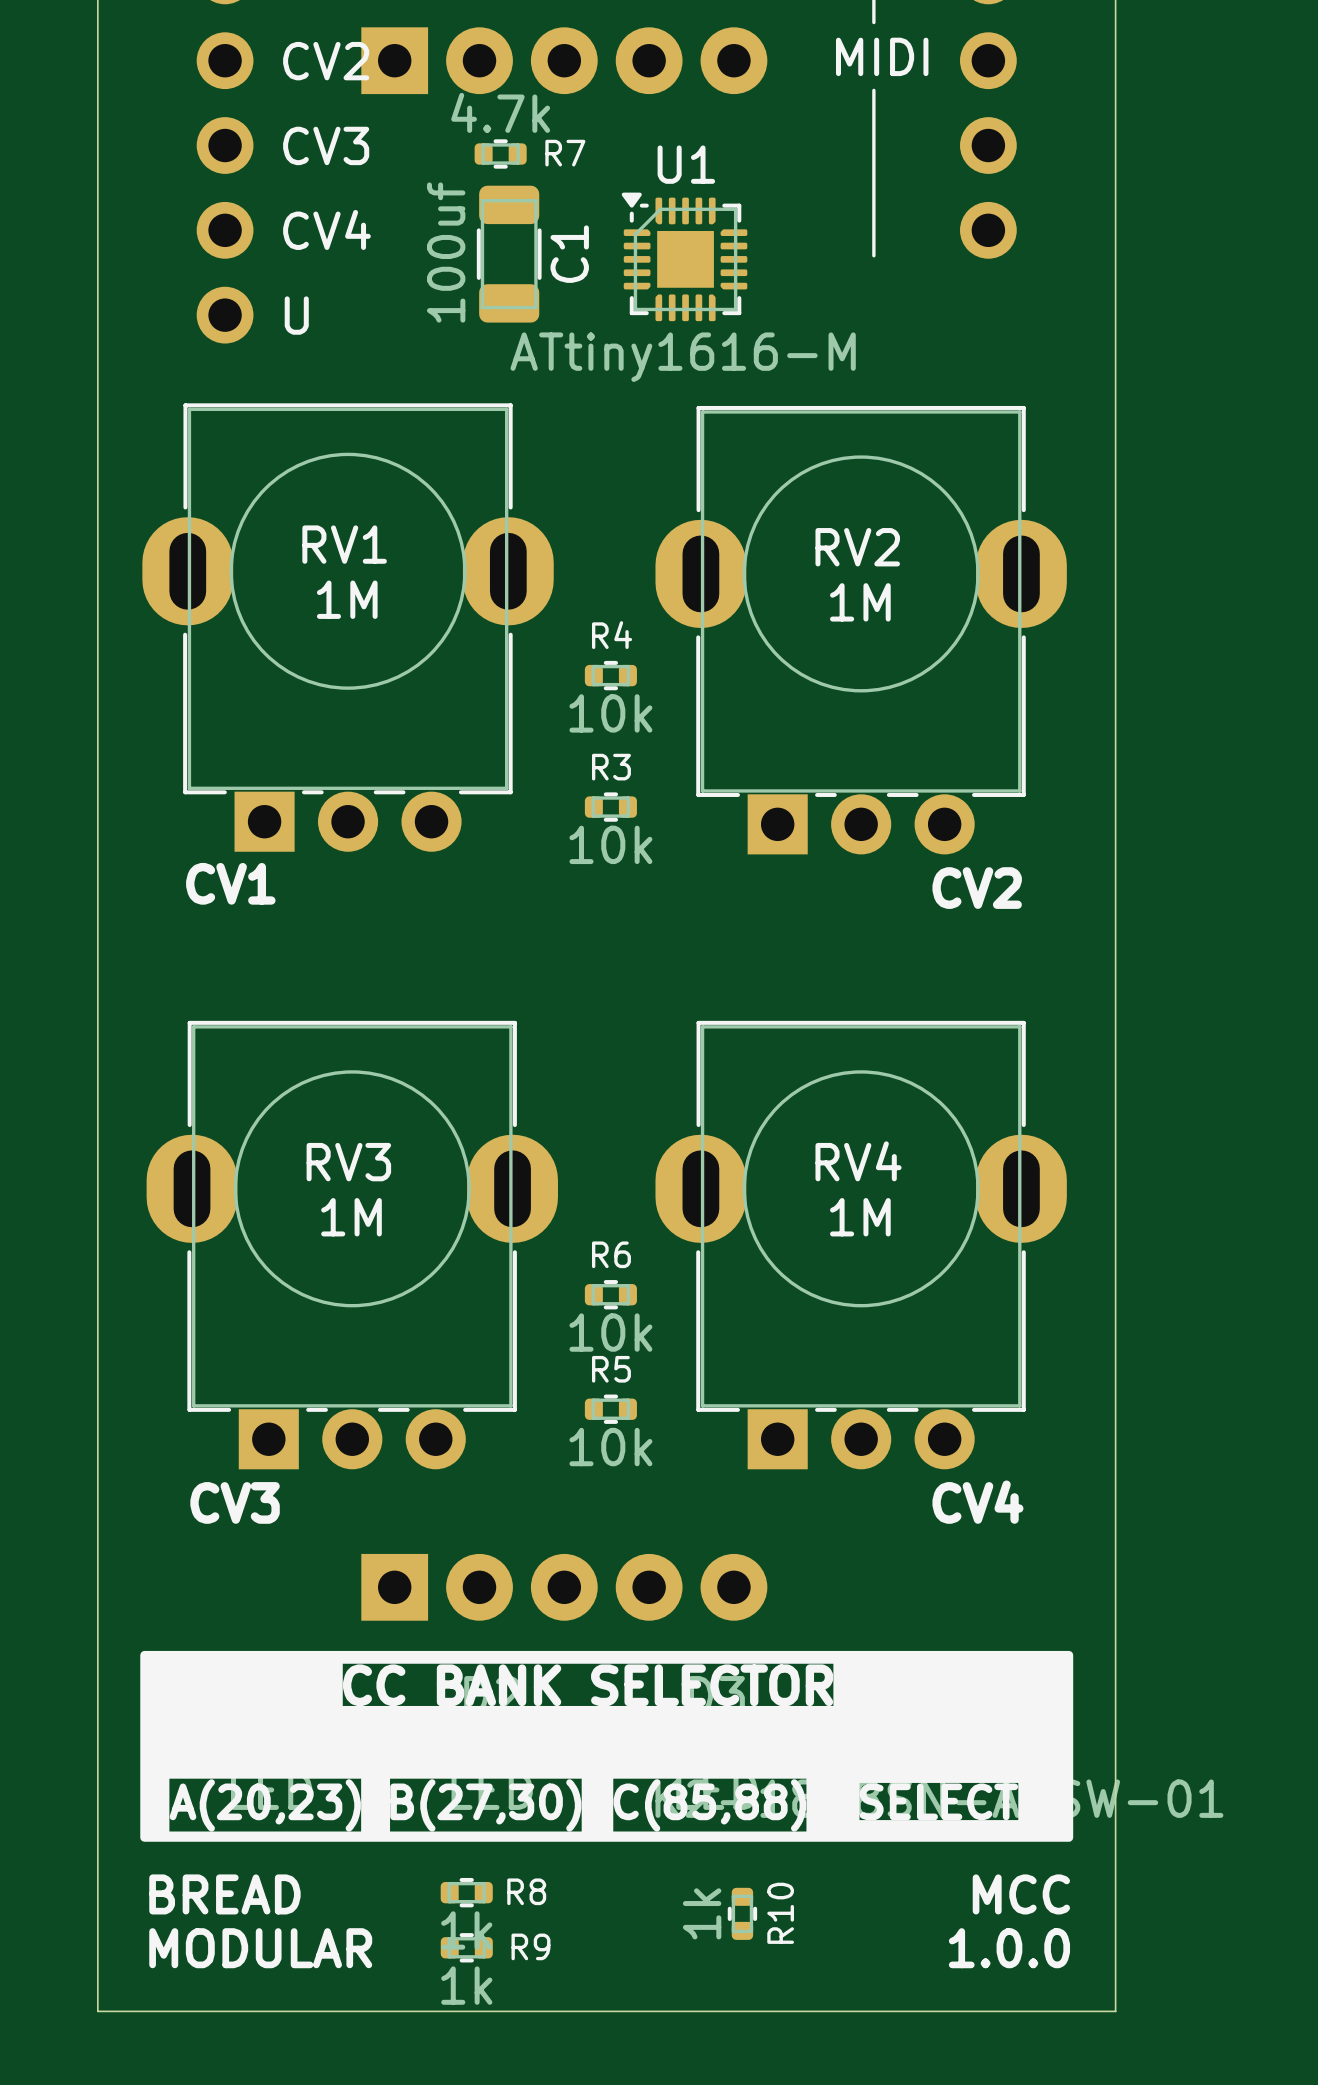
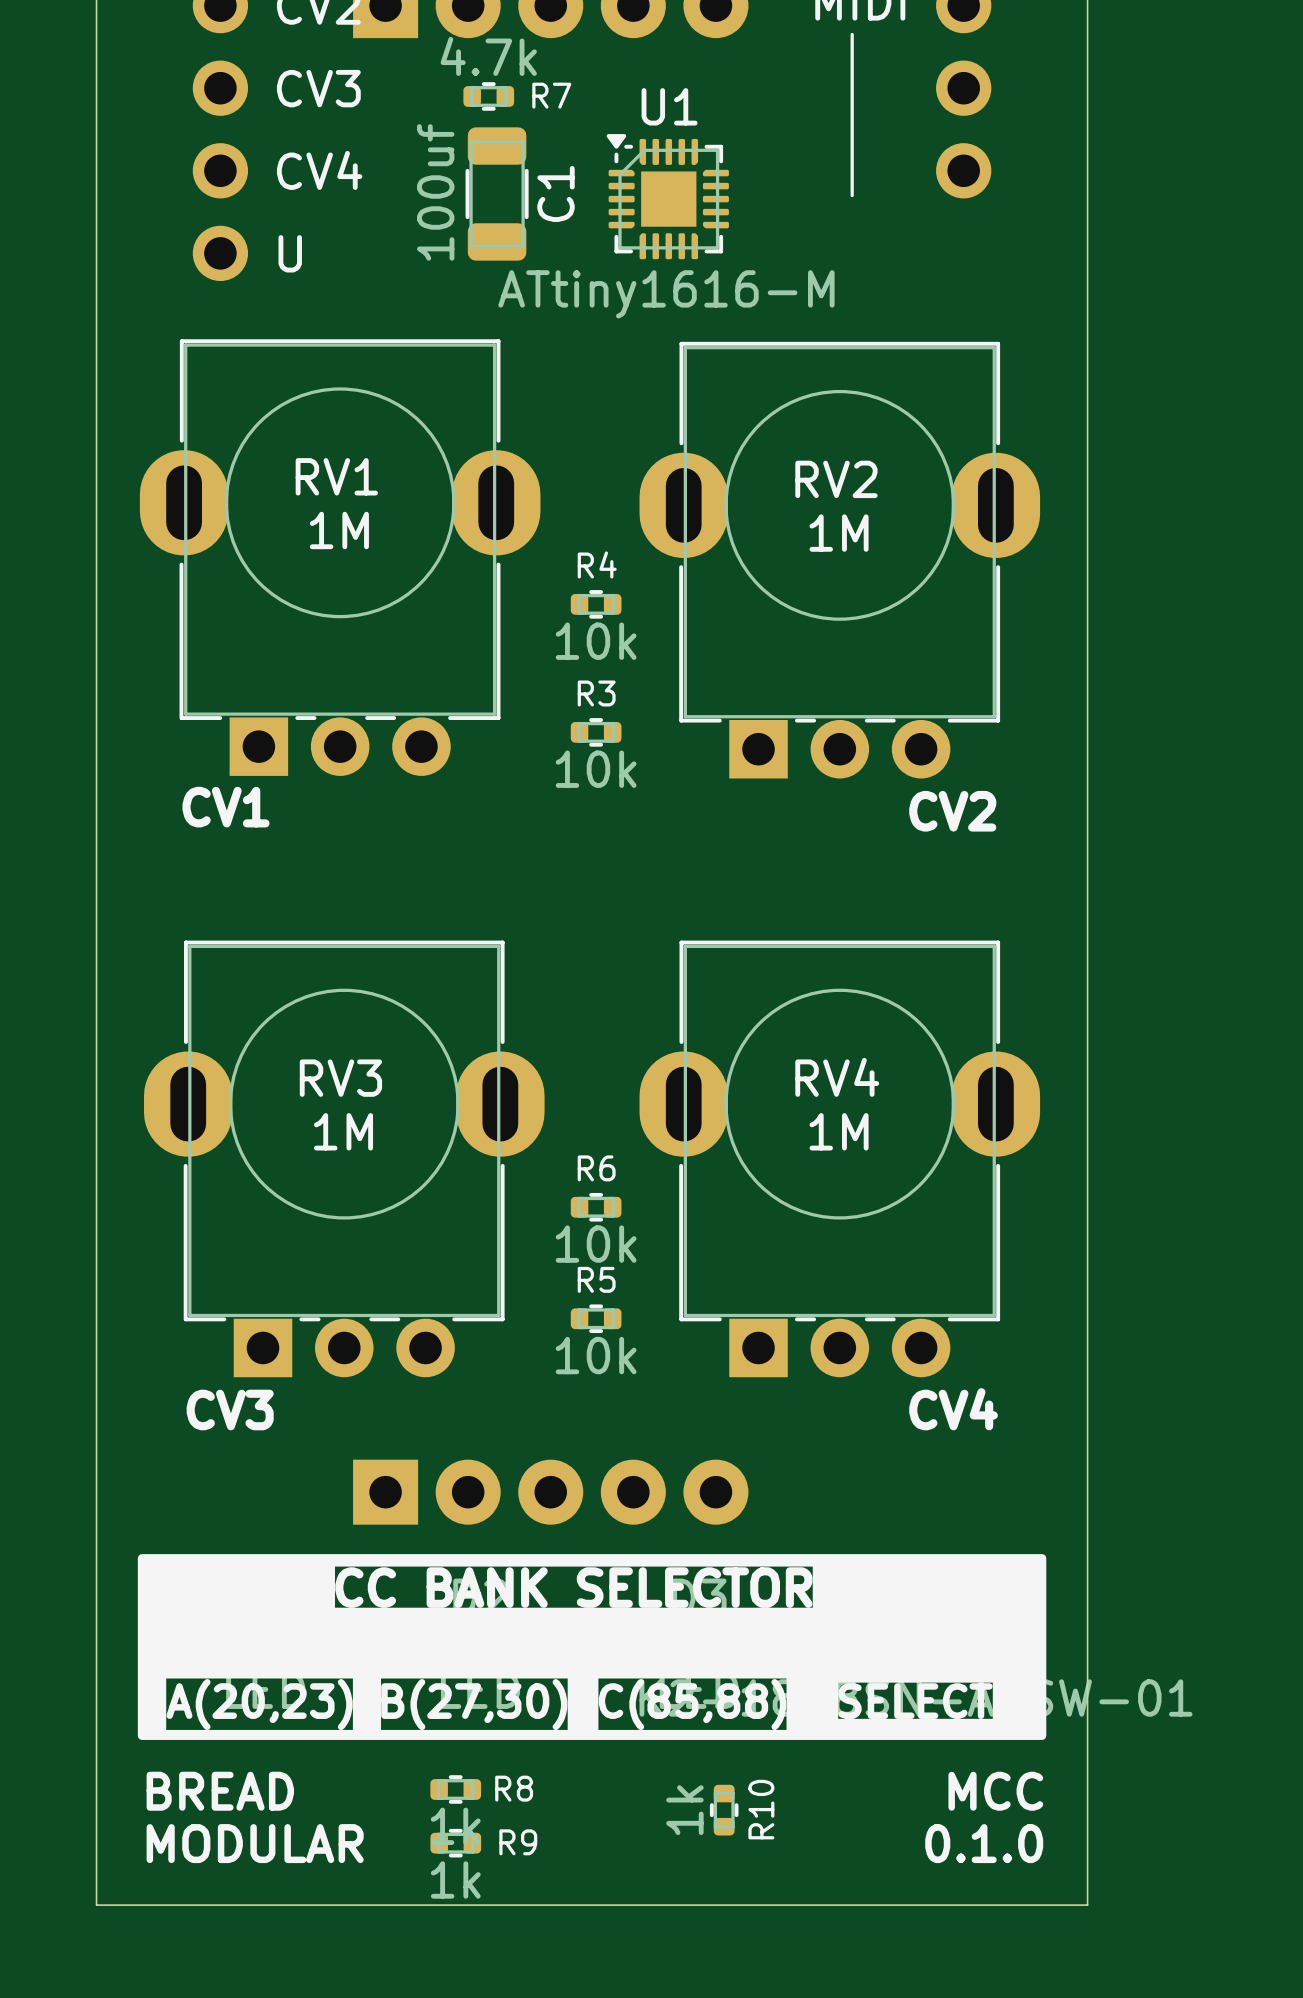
text: 1.0.0 (1009, 1948) -> 0.1.0 (984, 1843)

